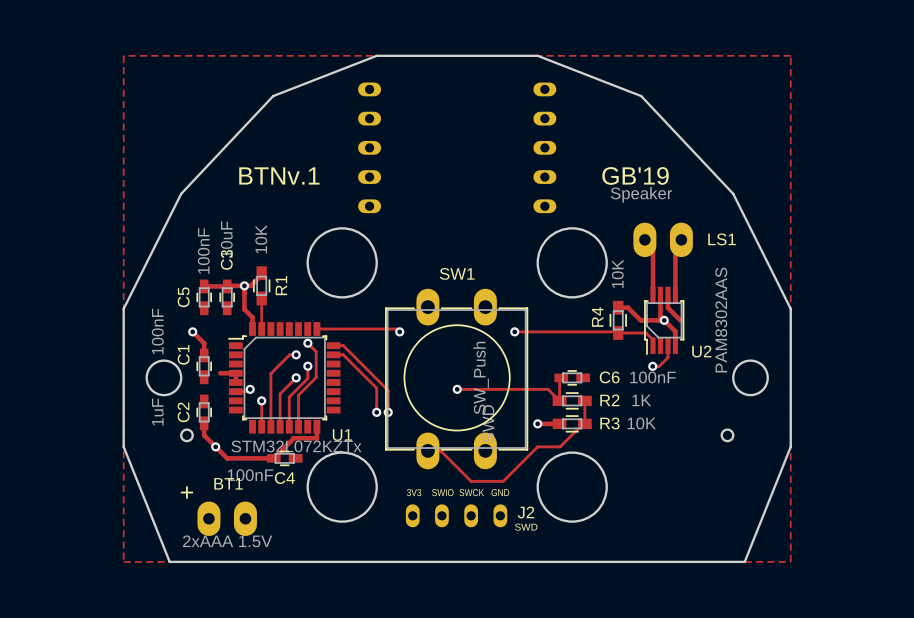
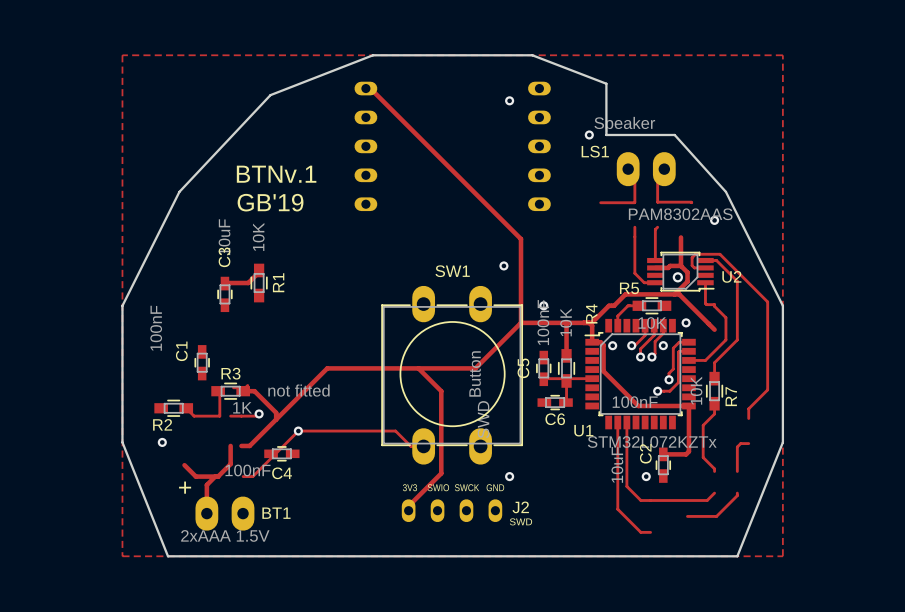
board edge: (537, 55) (641, 96) (733, 193) -> (532, 55) (606, 83) (606, 134) (674, 134) (725, 191)
track: none -> (365, 88) (370, 88) (521, 239) (521, 322)
via: none -> (509, 100)
via: none -> (589, 134)
track: none -> (628, 169) (634, 175) (634, 202) (600, 202)
track: none -> (664, 169) (657, 175) (657, 202) (691, 202)
text: GB'19 (635, 175) -> none
text: none -> GB'19 (270, 202)
via: none -> (714, 220)
round board edge: [306, 227, 378, 299] -> none
round board edge: [536, 227, 608, 299] -> none
track: none -> (634, 227) (634, 273) (644, 282) (655, 282)
track: none -> (657, 227) (655, 229) (655, 260)
track: (644, 239) (653, 247) (653, 295) -> none
LS1 position: (663, 239) -> (646, 169)
track: (681, 239) (675, 245) (675, 295) -> none
track: none -> (680, 237) (680, 265)
LS1 name position: LS1 (722, 239) -> LS1 (595, 151)
track: none -> (705, 260) (716, 260) (737, 281) (737, 339) (714, 362) (714, 378)
via: none -> (503, 265)
track: none -> (680, 265) (655, 267)
track: none -> (680, 265) (687, 272) (687, 281) (674, 294)
track: none -> (705, 267) (694, 267) (692, 265) (692, 257) (695, 254) (719, 254) (767, 301) (767, 389) (748, 408) (748, 418)
via: none -> (677, 277)
track: (244, 285) (244, 309) (252, 317) (252, 328) -> none
via: (244, 285) -> none
track: none -> (705, 282) (705, 303) (714, 304) (725, 317) (725, 339) (705, 360) (688, 360)
track: (204, 286) (227, 286) (227, 289) -> none
track: (660, 295) (660, 316) (675, 331) (675, 345) -> none
track: (667, 295) (667, 308) (680, 320) -> none
C5 position: (204, 297) -> (543, 368)
track: (261, 298) (261, 328) -> none
track: (618, 307) (628, 307) (640, 320) (664, 320) -> none
via: none -> (543, 305)
track: none -> (639, 305) (628, 305) (617, 316) (617, 325)
R5: none -> 10K (651, 305)
R4 position: (618, 320) -> (566, 368)
U2 rotation: 0° (664, 320) -> 90° counterclockwise (680, 271)
U2 position: (664, 320) -> (680, 271)
via: (664, 320) -> none
track: none -> (521, 322) (475, 368) (327, 368) (249, 445) (241, 445)
track: none -> (521, 322) (591, 322) (608, 305) (614, 305) (625, 294) (679, 294) (714, 329)
track: none -> (566, 322) (566, 355)
track: none -> (589, 322) (592, 325) (592, 342) (600, 342) (603, 345) (603, 371) (638, 405) (688, 405) (688, 451) (686, 454) (663, 454)
via: none -> (686, 322)
track: (316, 328) (396, 328) (399, 331) -> none
track: none -> (645, 325) (645, 335) (634, 345) (631, 345)
track: none -> (654, 325) (654, 335) (640, 348) (640, 357)
track: none -> (663, 325) (663, 333) (655, 341) (655, 353) (651, 357)
track: (192, 331) (204, 343) (204, 355) -> none
via: (192, 331) -> none
via: (399, 331) -> none
track: (514, 331) (646, 333) (653, 339) (653, 345) -> none
via: (514, 331) -> none
track: (307, 343) (316, 351) (316, 377) (298, 395) (298, 426) -> none
via: (307, 343) -> none
track: (333, 345) (343, 345) (388, 390) (388, 412) -> none
track: (667, 345) (667, 357) (659, 366) (652, 366) -> none
track: none -> (688, 342) (679, 342) (673, 348) (673, 369) (669, 373) (669, 379)
via: none -> (612, 345)
via: none -> (631, 345)
via: none -> (663, 345)
U2 name position: U2 (701, 351) -> U2 (731, 276)
track: (296, 354) (289, 354) (270, 373) (270, 426) -> none
via: (296, 354) -> none
track: (333, 354) (343, 354) (376, 388) (376, 412) -> none
track: none -> (688, 351) (678, 352) (678, 382) (669, 391) (657, 391)
round board edge: [145, 359, 183, 397] -> none
round board edge: [732, 359, 769, 397] -> none
via: none -> (640, 357)
via: none -> (651, 357)
track: (307, 366) (307, 378) (289, 397) (289, 426) -> none
via: (307, 366) -> none
via: (652, 366) -> none
track: none -> (418, 368) (441, 391) (441, 473) (408, 506) (408, 510)
track: (220, 373) (235, 373) (235, 382) -> none
U1 position: (284, 377) -> (640, 374)
track: (296, 377) (280, 393) (280, 426) -> none
via: (296, 377) -> none
track: (561, 377) (559, 379) (559, 400) (548, 389) (457, 389) -> none
C6 position: (572, 377) -> (555, 402)
C6 name position: C6 (609, 377) -> C6 (555, 419)
SW1 value: SW_Push (481, 378) -> Button (475, 373)
track: none -> (592, 378) (546, 378) (543, 380)
track: none -> (566, 379) (565, 402)
via: none -> (669, 379)
via: (250, 389) -> none
via: (457, 389) -> none
track: none -> (218, 391) (219, 392) (219, 416) (194, 416) (186, 408)
track: none -> (243, 391) (254, 391) (276, 412) (276, 419)
via: none -> (657, 391)
R7: none -> 10K (714, 391)
track: (261, 400) (261, 426) -> none
via: (261, 400) -> none
R2 position: (572, 400) -> (173, 408)
track: (584, 400) (584, 423) (560, 446) (537, 446) (503, 481) (471, 481) (440, 450) (427, 450) -> (243, 476) (252, 476) (298, 431) (395, 431) (410, 446) (423, 446)
R2 name position: R2 (609, 400) -> R2 (162, 424)
track: none -> (714, 403) (714, 413) (703, 425) (703, 457) (714, 468) (714, 471)
C2 value: 1uF (157, 412) -> 10uF (617, 464)
C2 name position: C2 (183, 412) -> C2 (645, 453)
C2 position: (204, 412) -> (663, 465)
via: (376, 412) -> none
via: (388, 412) -> none
track: none -> (259, 413) (256, 416) (230, 416)
via: none -> (259, 413)
track: (204, 423) (204, 435) (227, 458) (273, 458) (293, 438) (316, 438) (316, 426) -> none
track: (537, 423) (559, 423) -> none
via: (537, 423) -> none
R3 position: (572, 423) -> (230, 391)
R3 name position: R3 (609, 423) -> R3 (230, 373)
R3 value: 10K (641, 423) -> not fitted (298, 390)
track: none -> (617, 422) (617, 509) (640, 532) (650, 532)
track: none -> (626, 422) (626, 486) (640, 500) (707, 500) (714, 493)
round board edge: [180, 428, 194, 443] -> none
round board edge: [720, 428, 735, 443] -> none
via: none -> (298, 431)
U1 name position: U1 (342, 435) -> U1 (583, 430)
via: none -> (162, 442)
via: (215, 446) -> none
track: none -> (748, 443) (740, 443) (737, 446) (737, 471)
track: none -> (230, 445) (230, 464) (218, 476) (195, 476) (184, 465)
round board edge: [306, 451, 378, 523] -> none
round board edge: [536, 451, 608, 523] -> none
track: none -> (215, 476) (206, 484) (206, 516)
via: none -> (509, 476)
via: none -> (646, 476)
BT1 name position: BT1 (228, 483) -> BT1 (276, 513)
track: none -> (737, 493) (737, 495) (716, 516) (687, 516)

